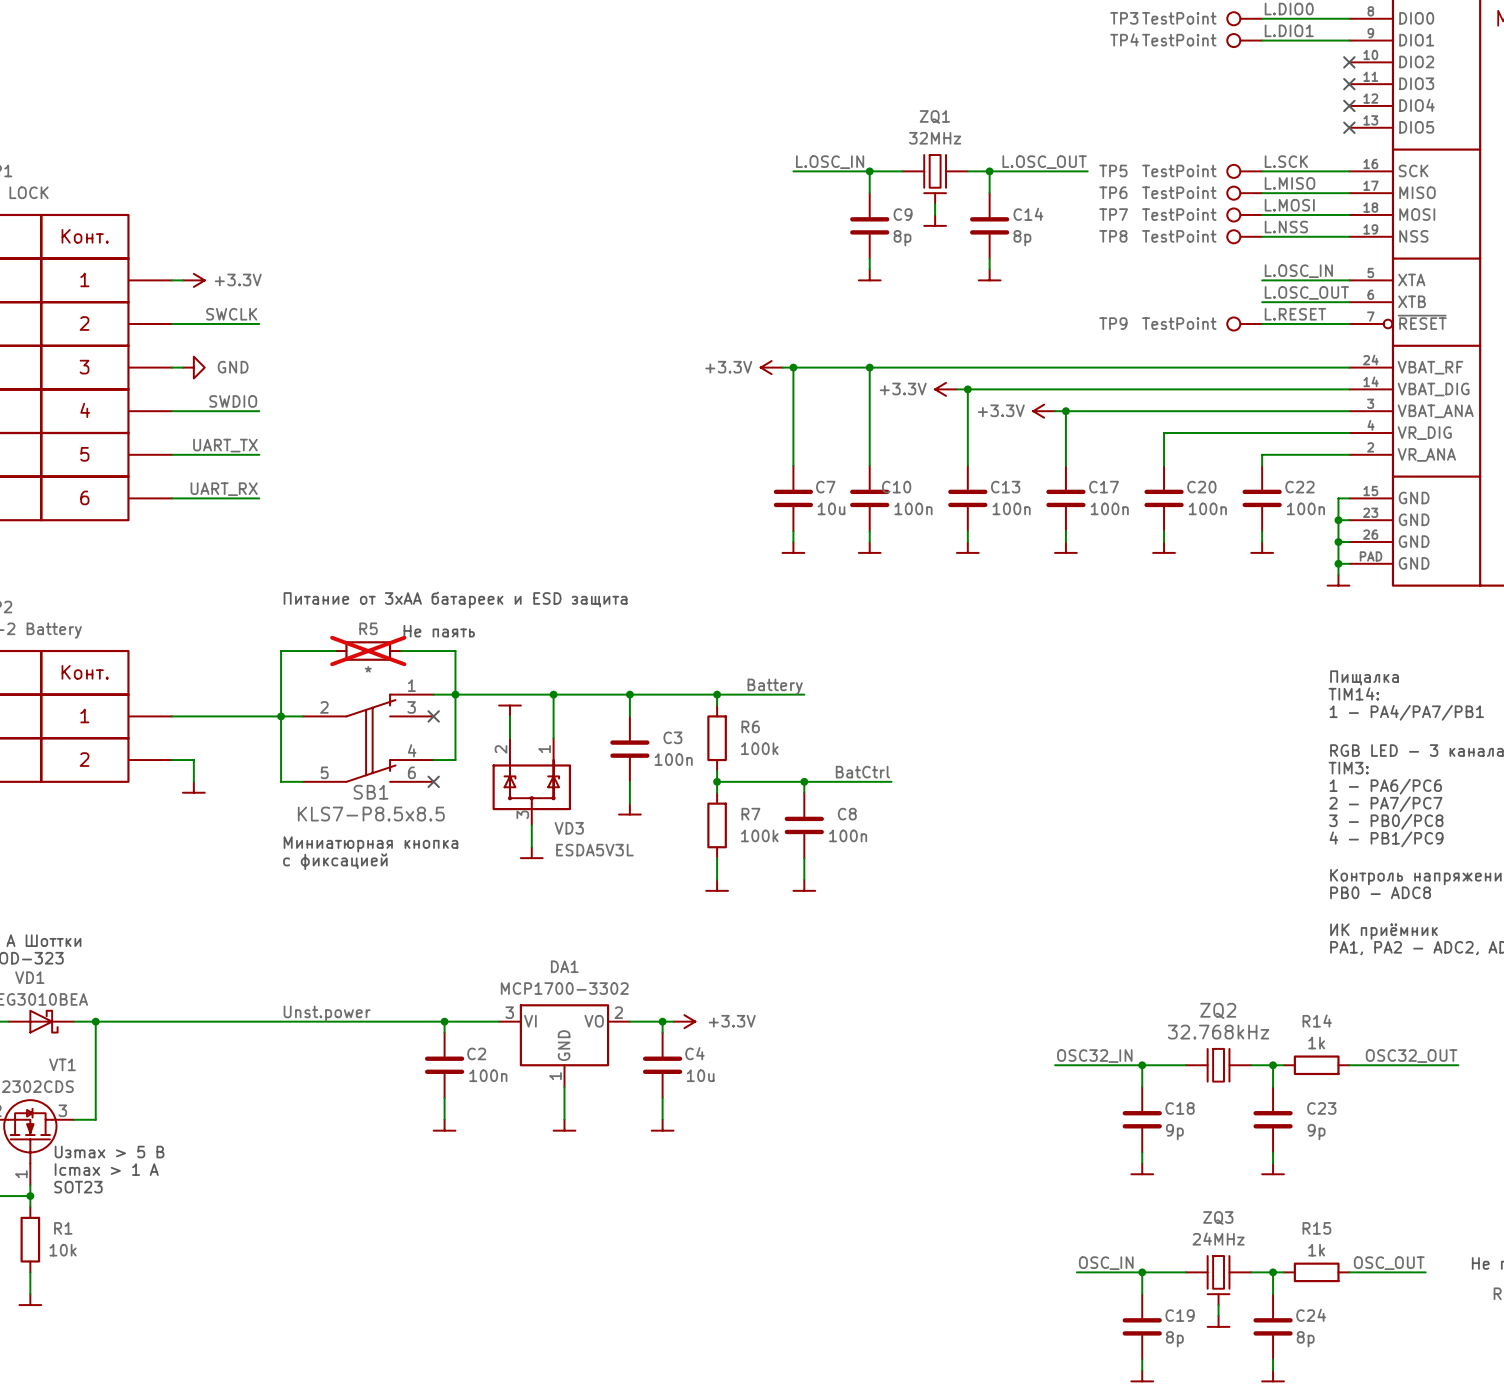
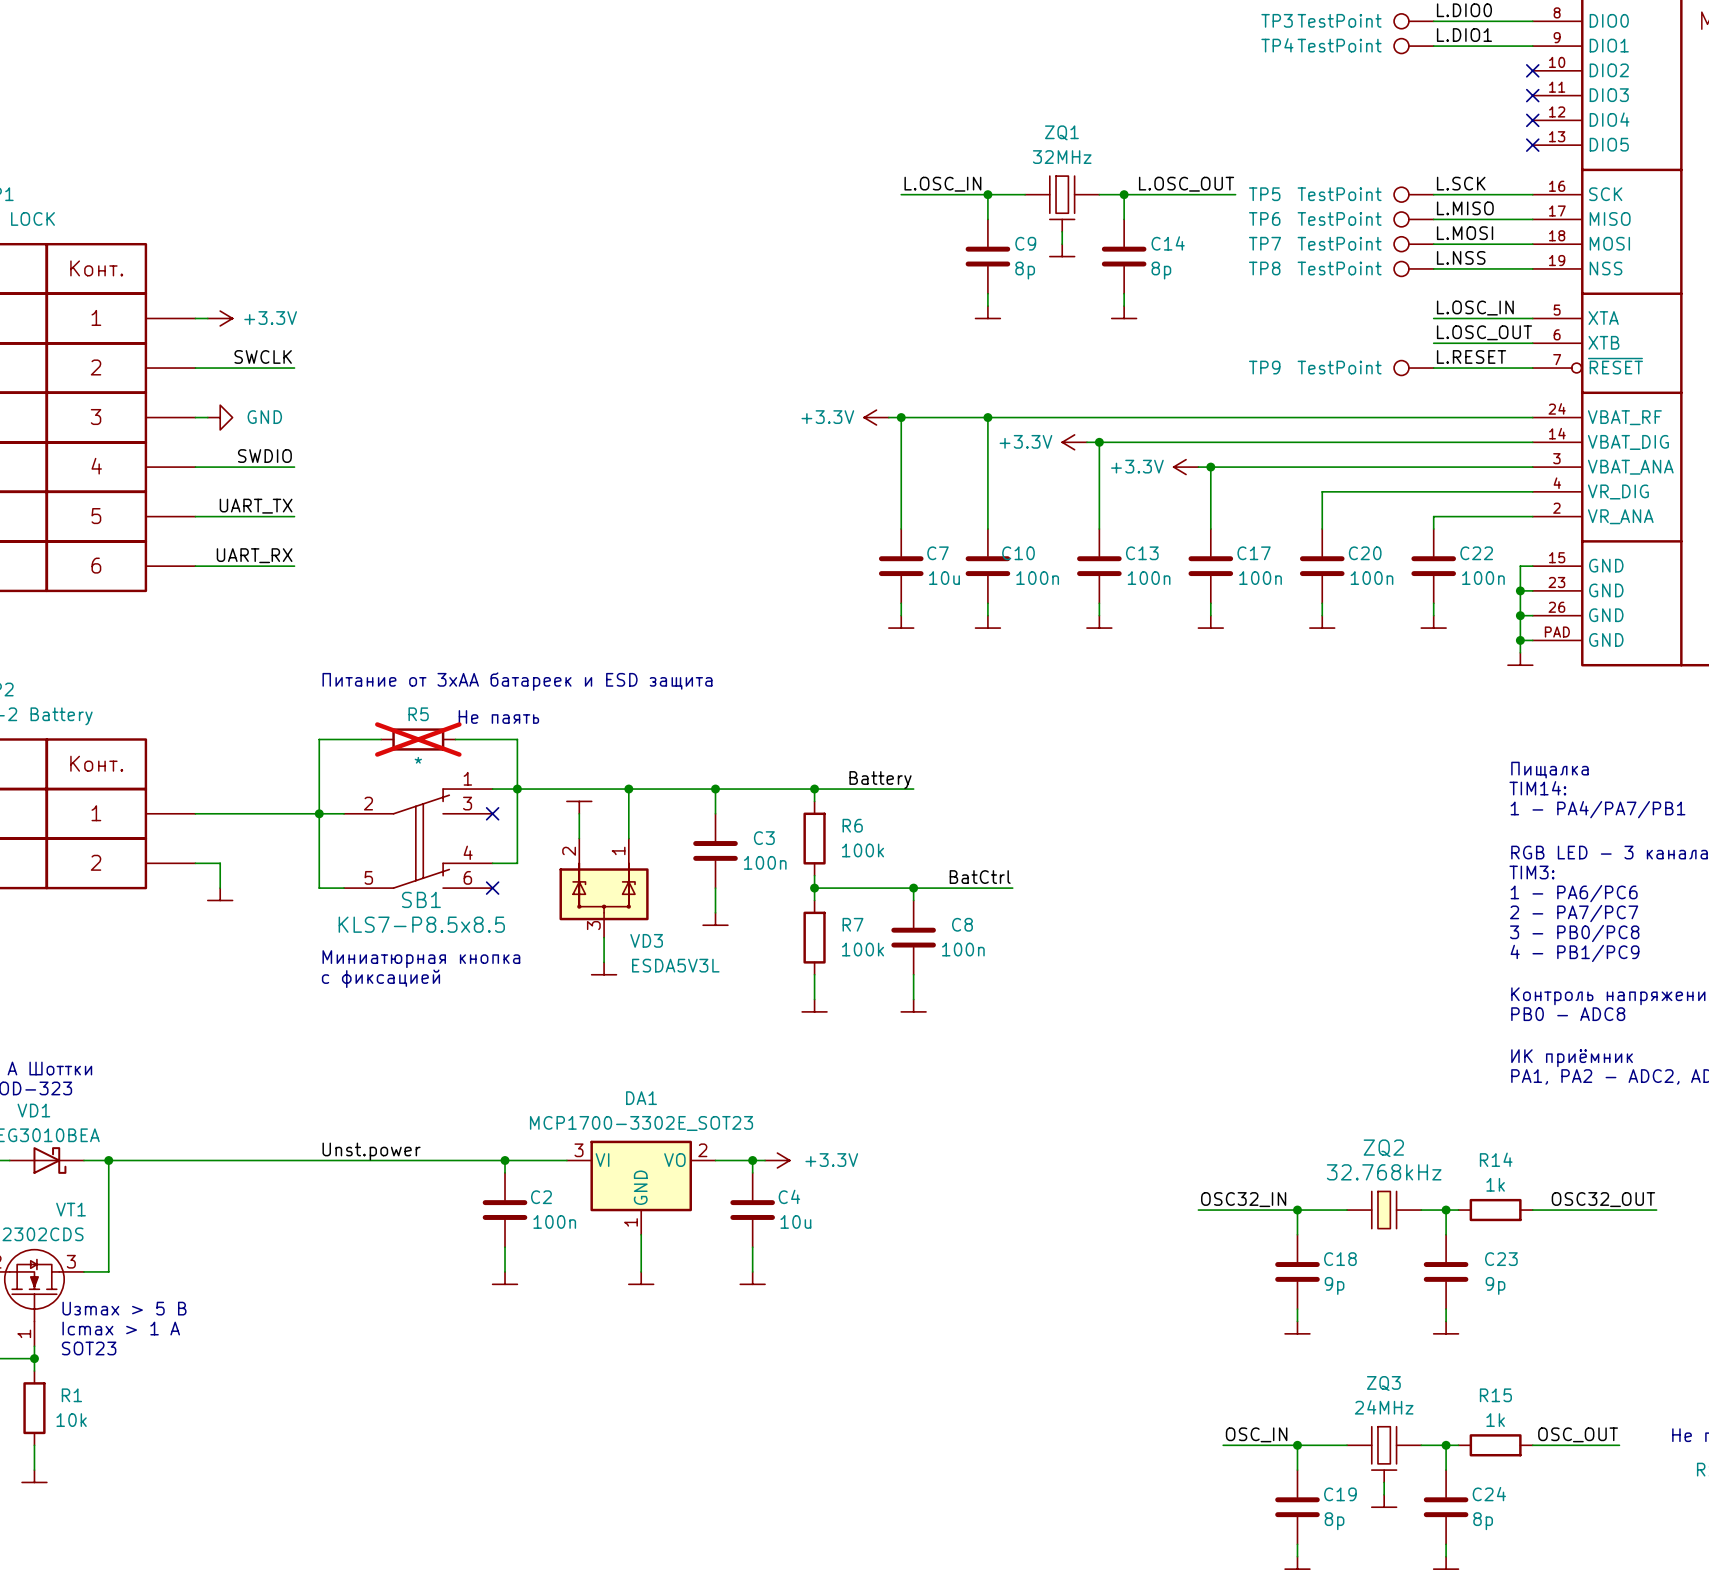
DA1 value: MCP1700-3302 (564, 988) -> MCP1700-3302E_SOT23 (641, 1123)

